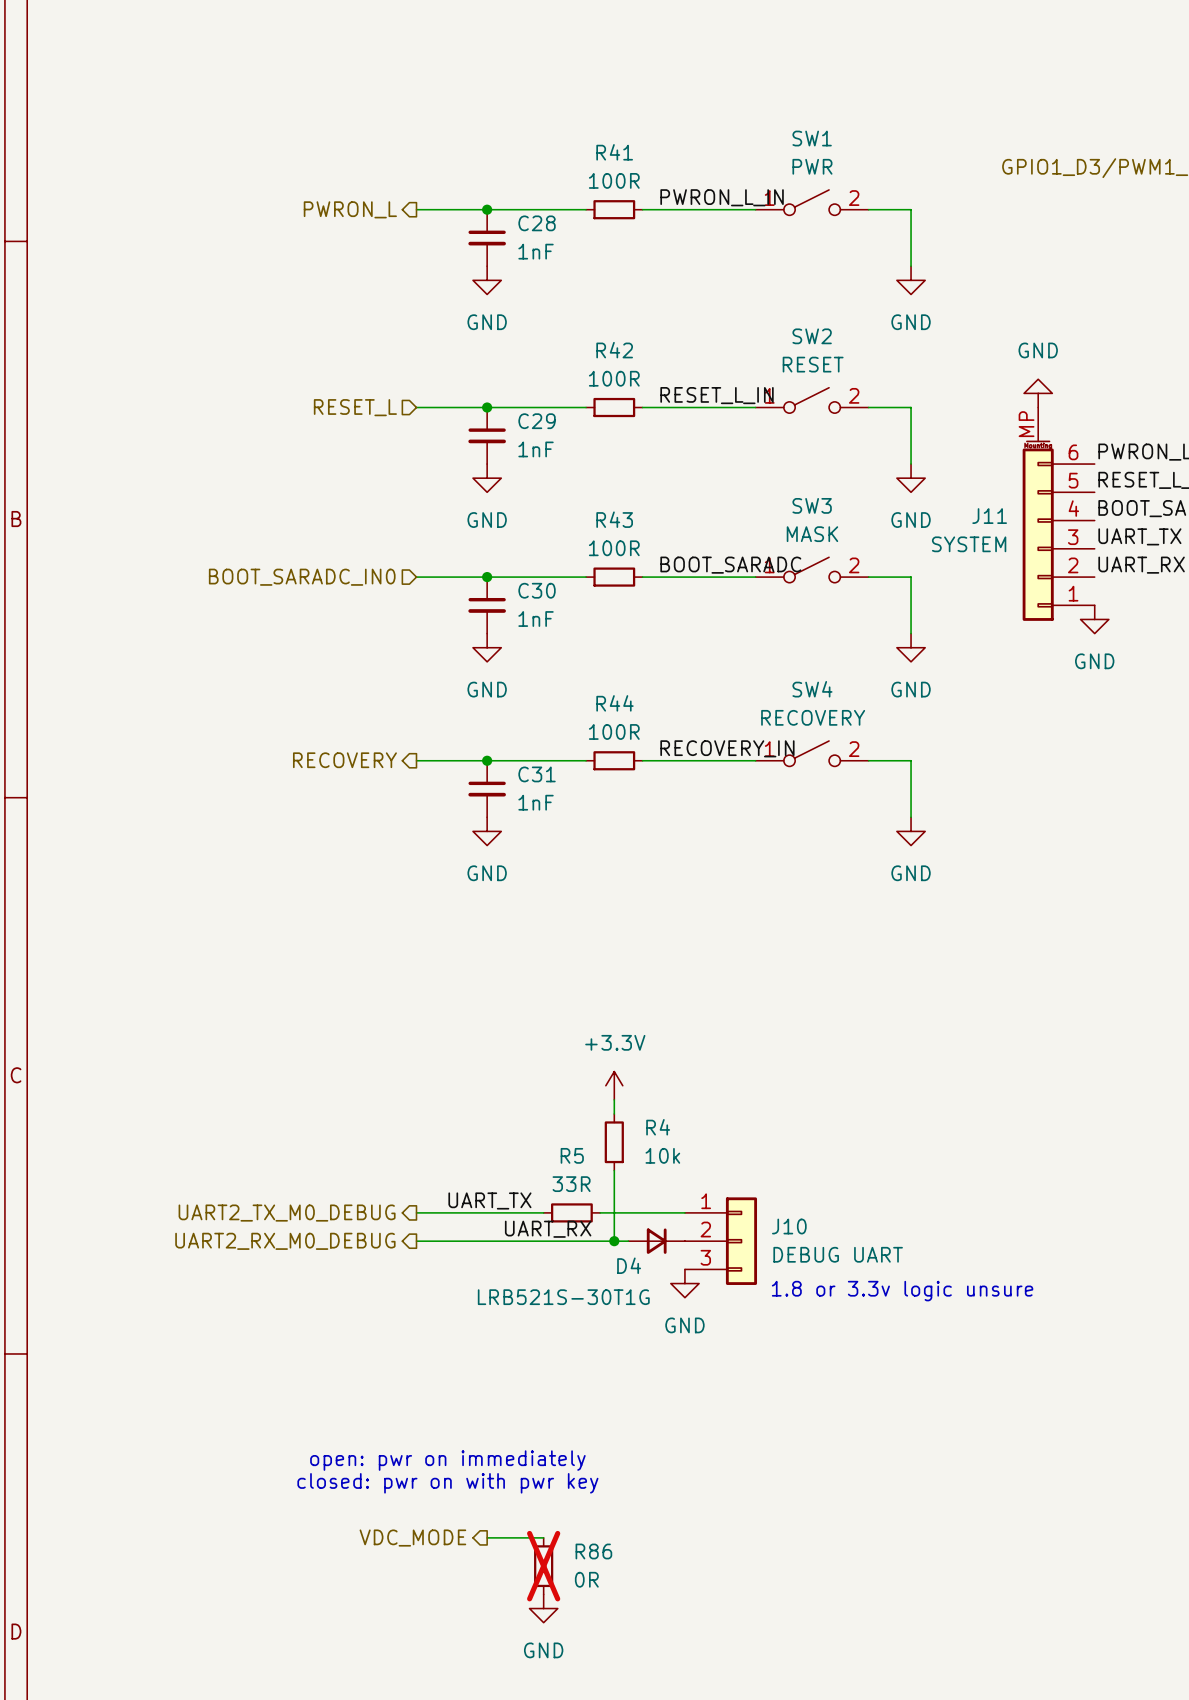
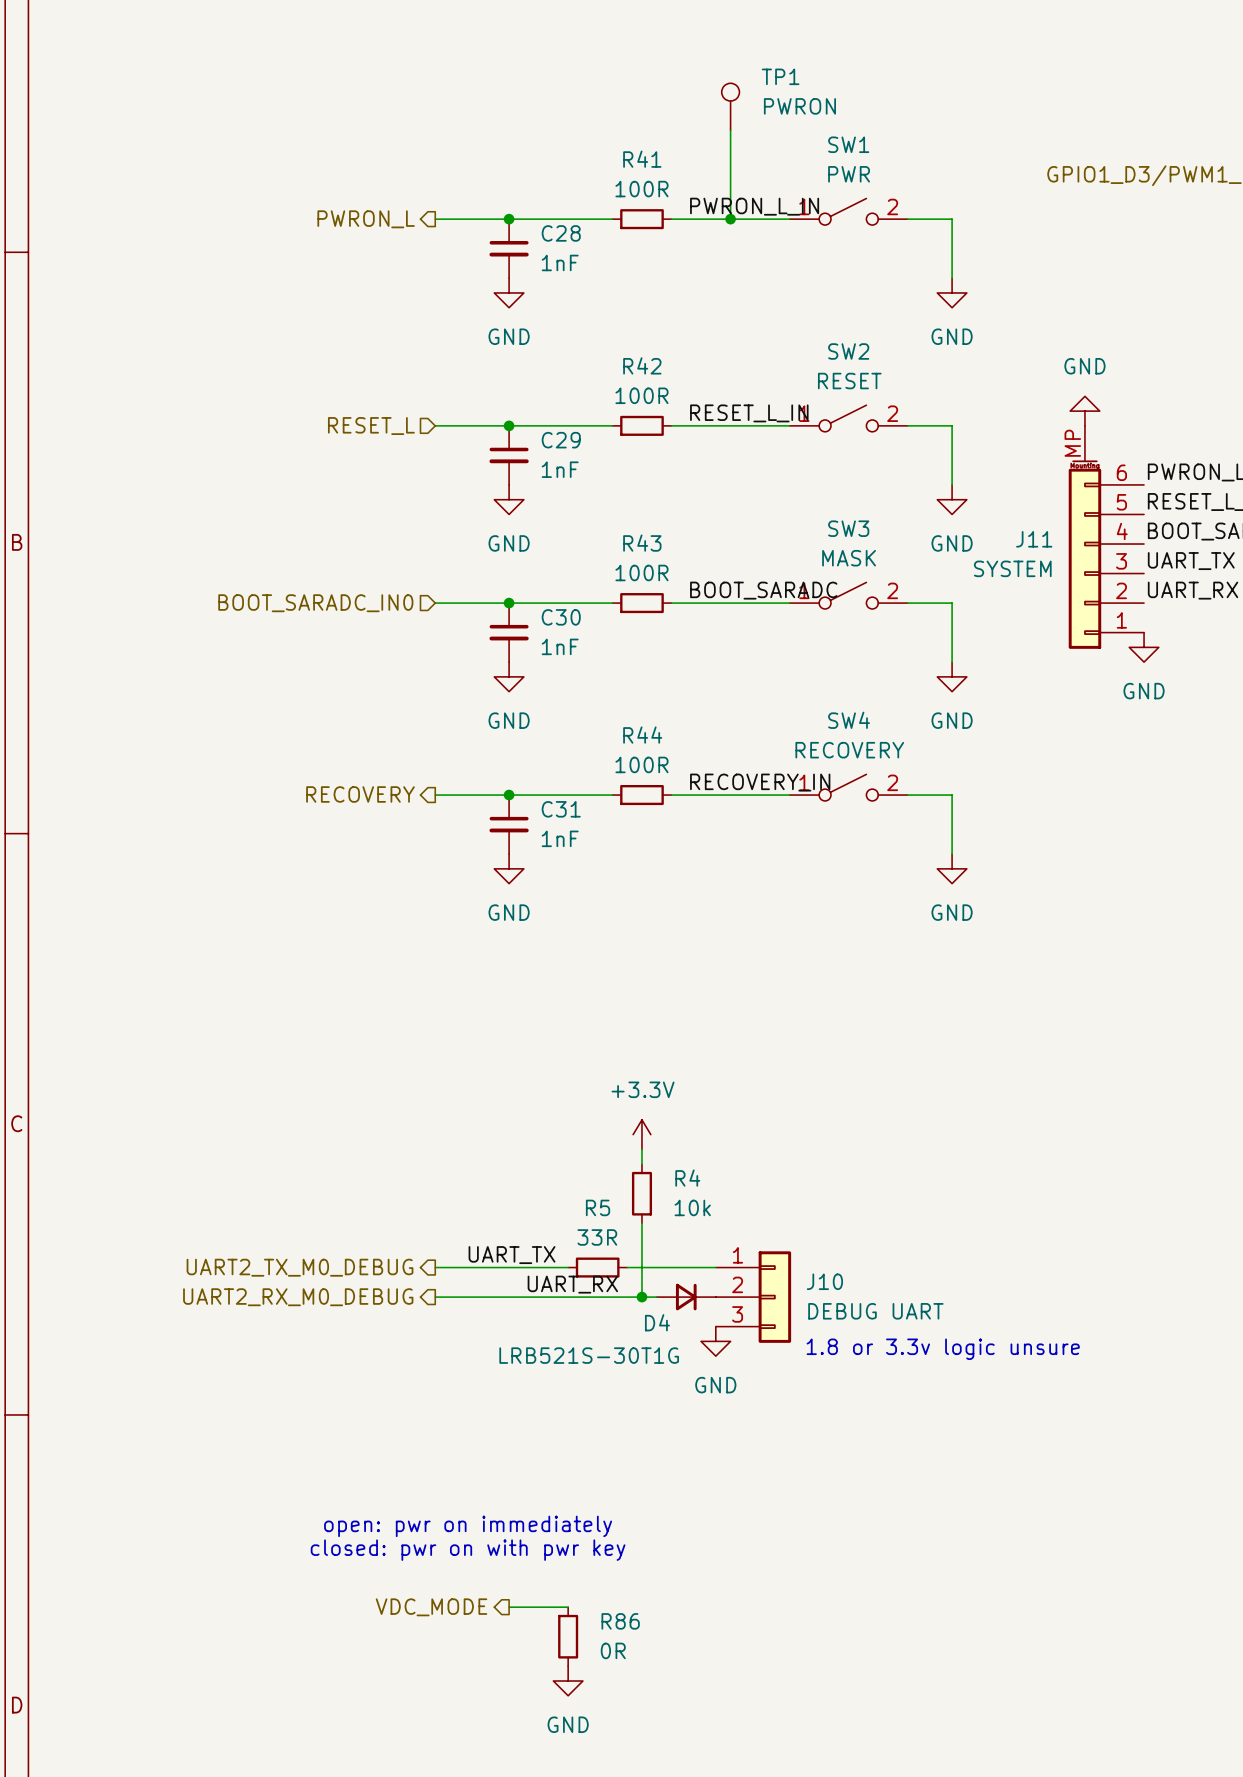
TP1: none -> PWRON (730, 106)
wire: none -> (730, 130) (730, 219)
junction: none -> (730, 219)
R86 do-not-place cross: (543, 1566) -> none

